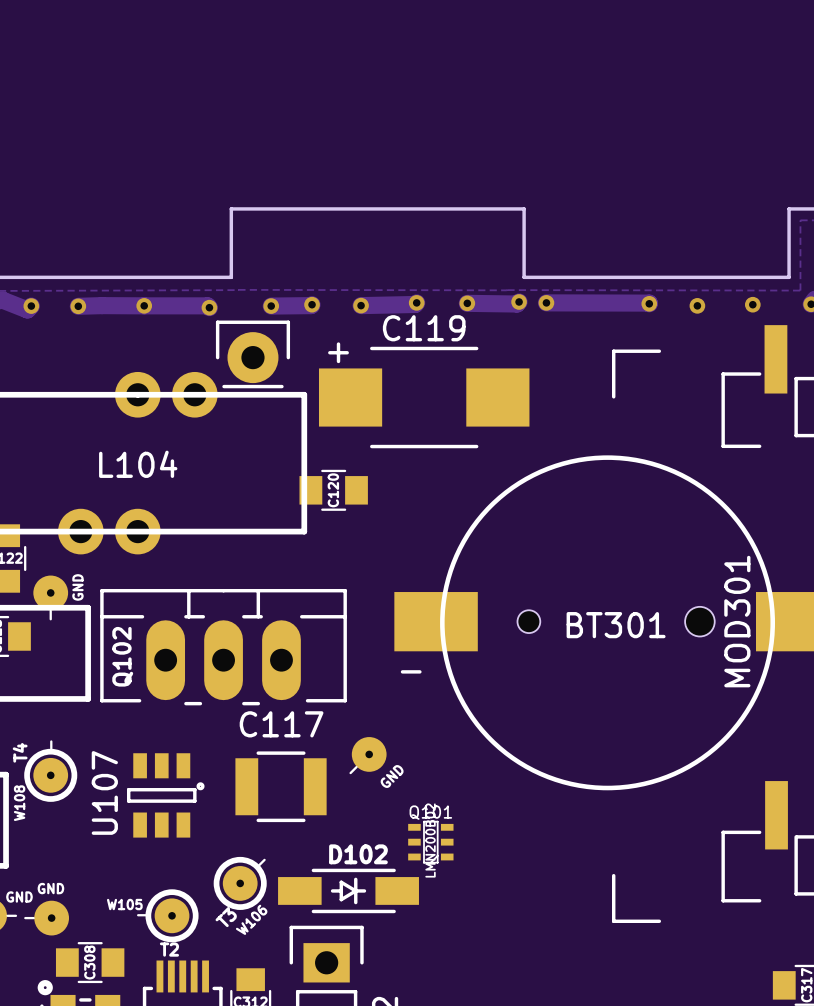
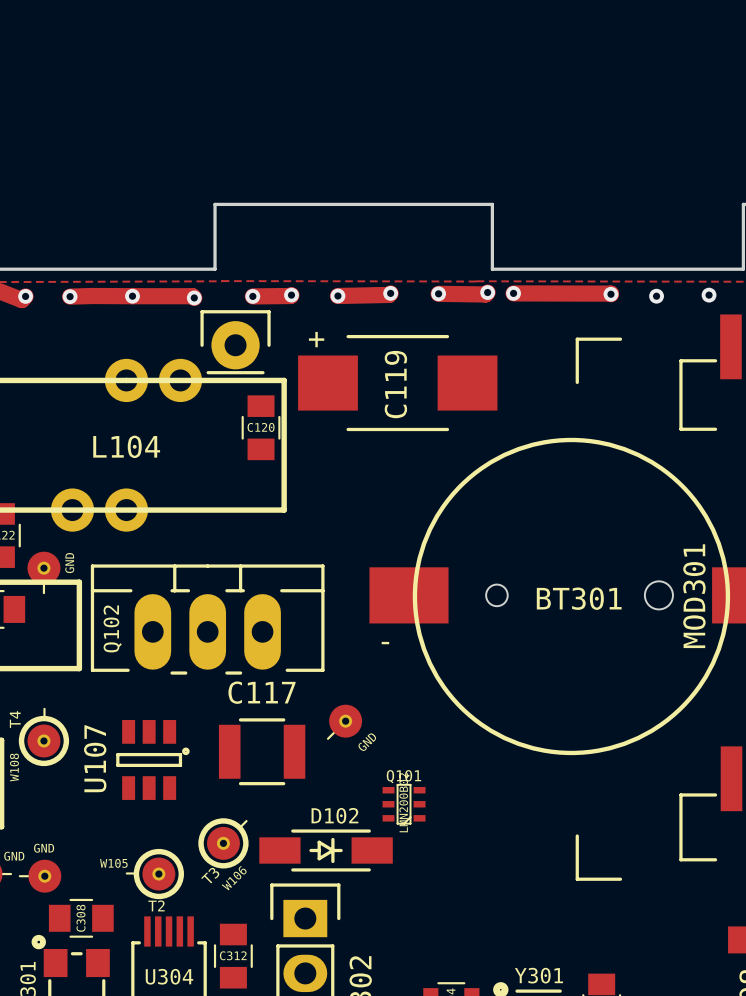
C119 name rotation: 0° (424, 328) -> 90° counterclockwise (395, 384)
C120 rotation: 0° (333, 490) -> 90° clockwise (261, 427)
C120 position: (333, 490) -> (261, 427)

